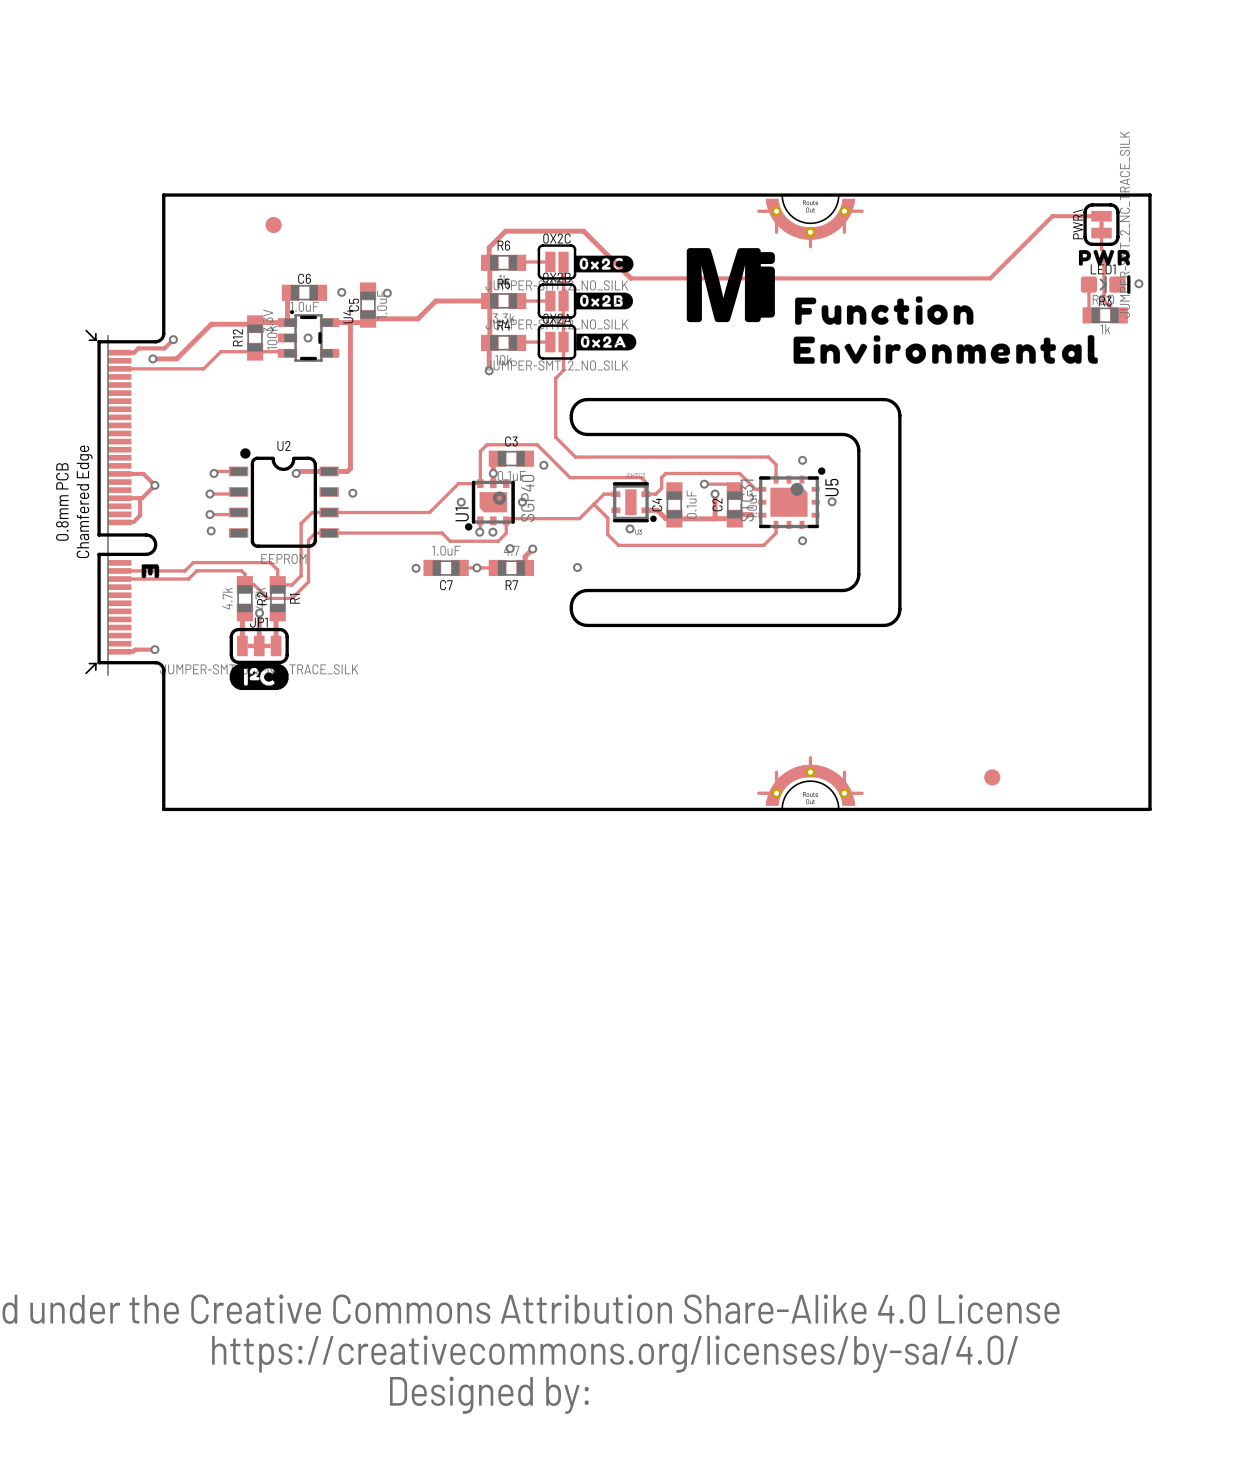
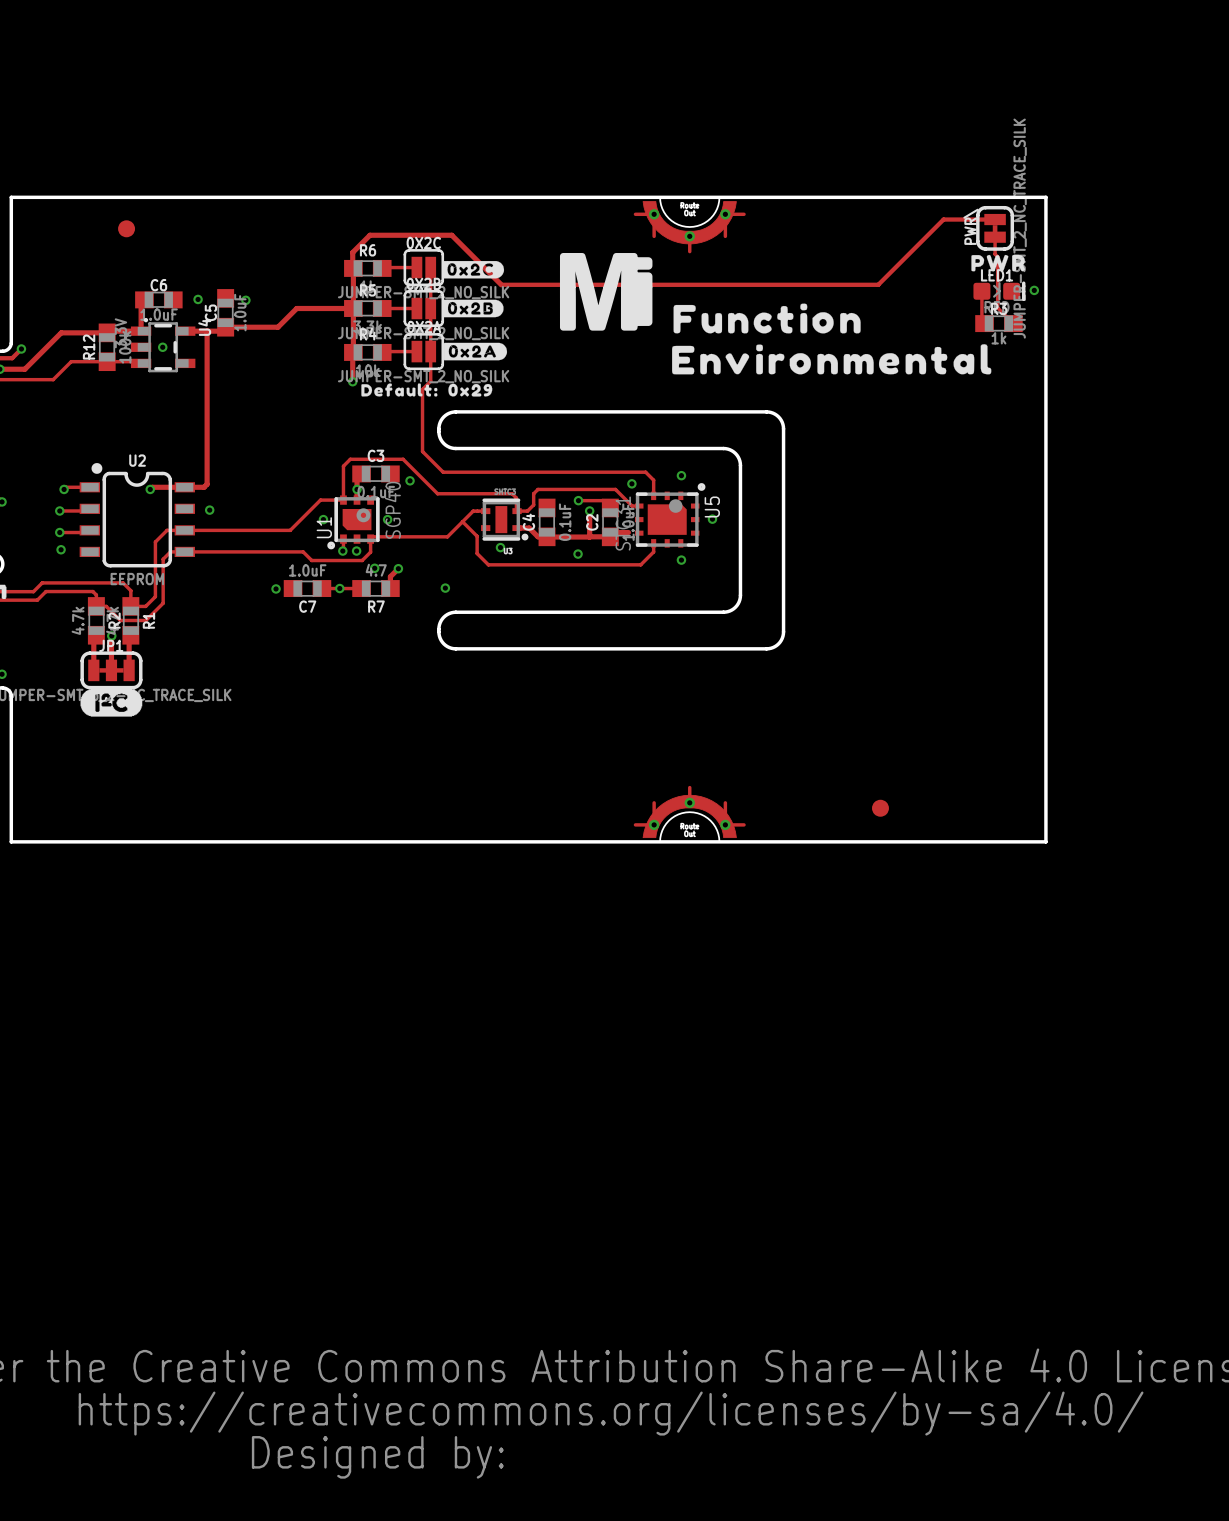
drawing: none -> [361, 383, 493, 397]
via: none -> (631, 483)
via: none -> (578, 554)

